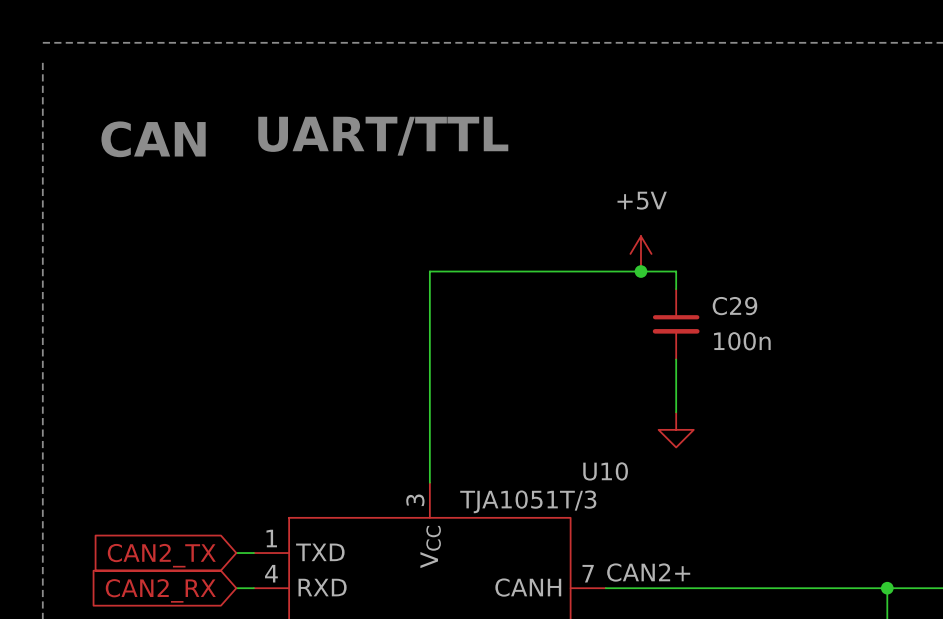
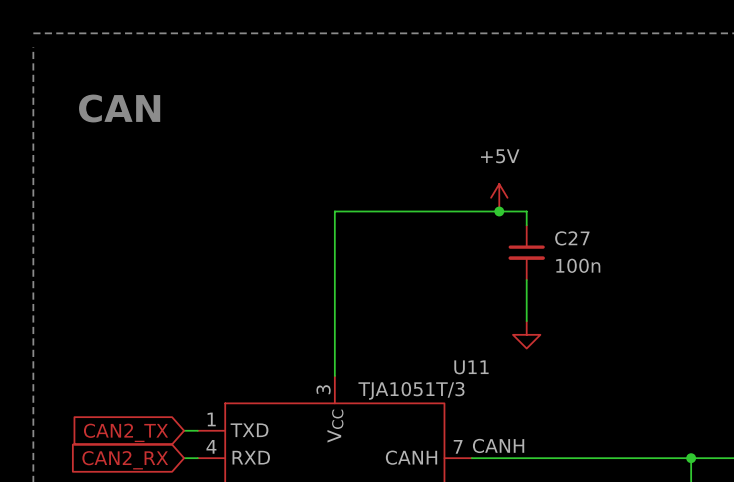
text: UART/TTL (383, 136) -> none
C29 name: C29 (734, 306) -> C27 (572, 238)
U10 name: U10 (605, 471) -> U11 (471, 367)
label: CAN2+ (648, 572) -> CANH (498, 445)

